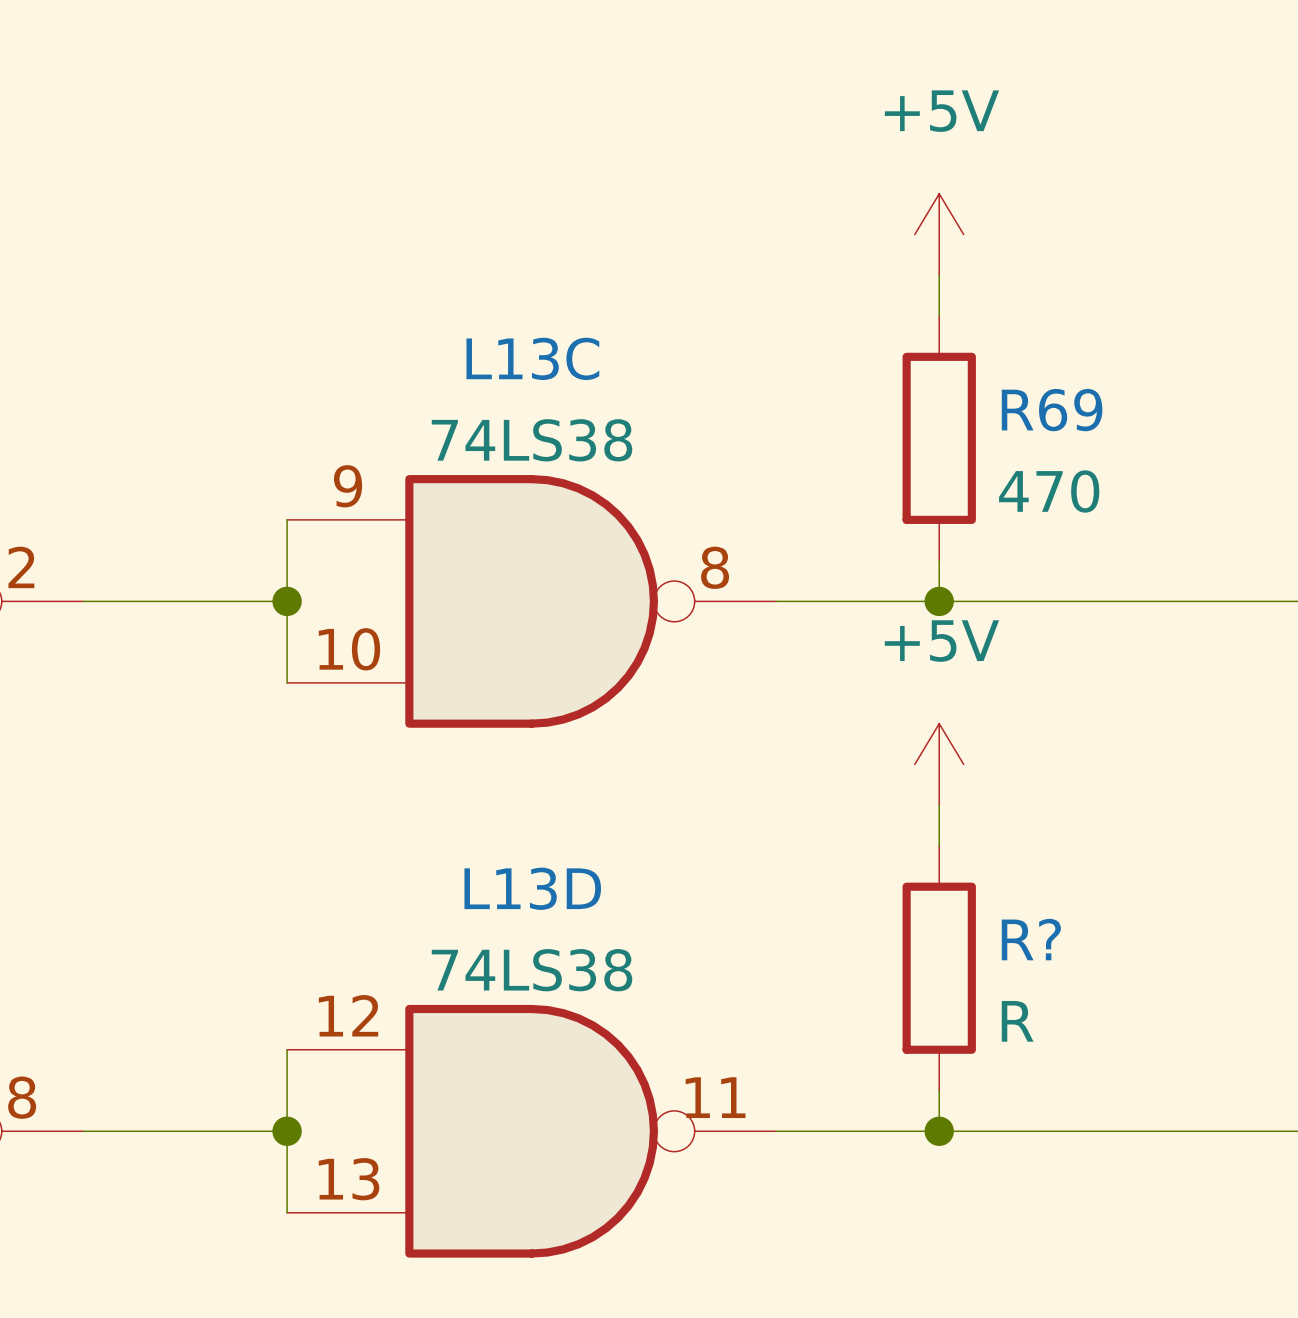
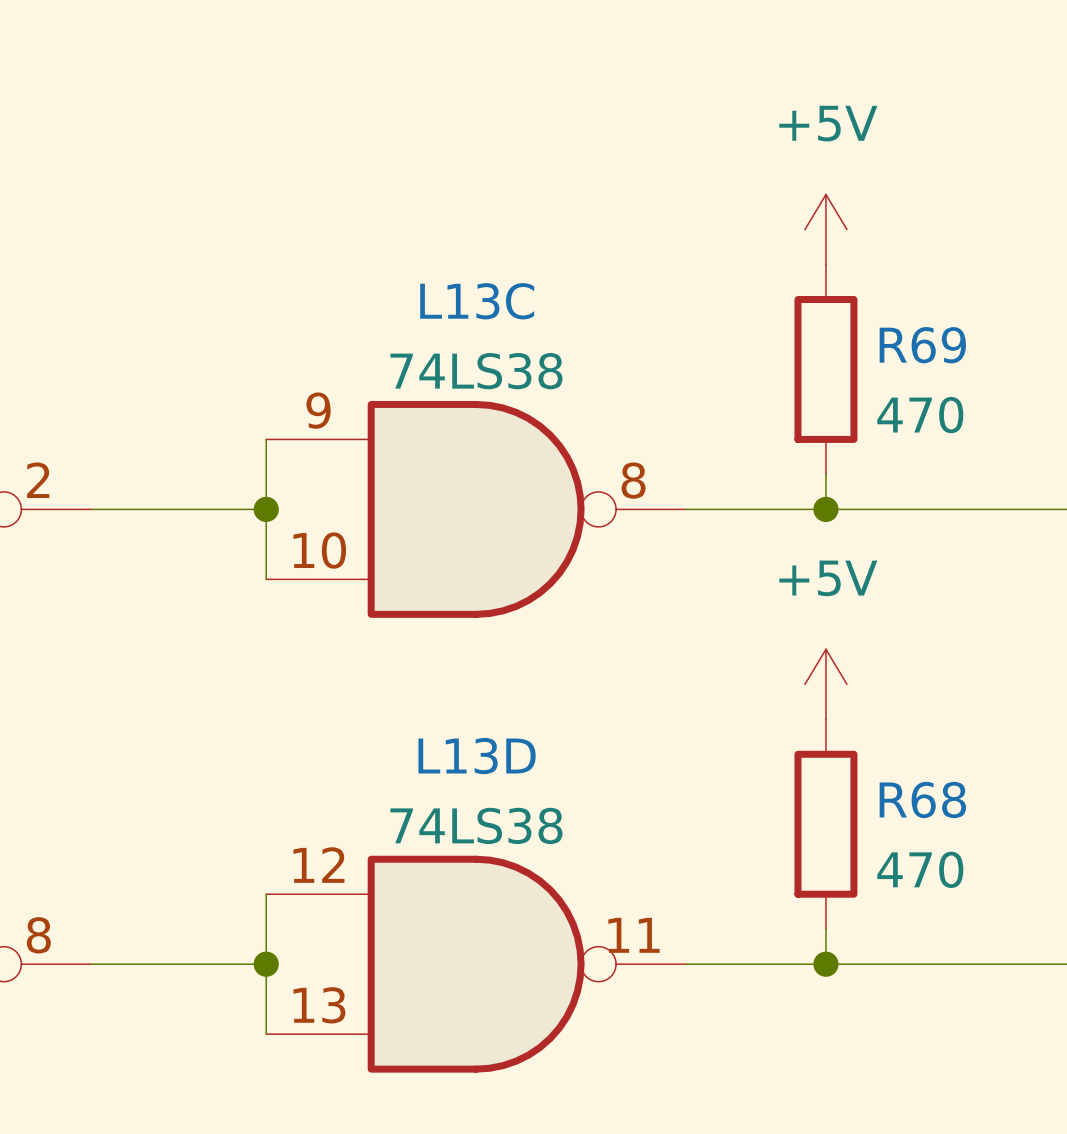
power symbol position: +5V (939, 234) -> +5V (825, 229)
power symbol position: +5V (939, 764) -> +5V (825, 684)
R? name: R? (1031, 939) -> R68 (922, 799)
R? value: R (1017, 1021) -> 470 (920, 869)

